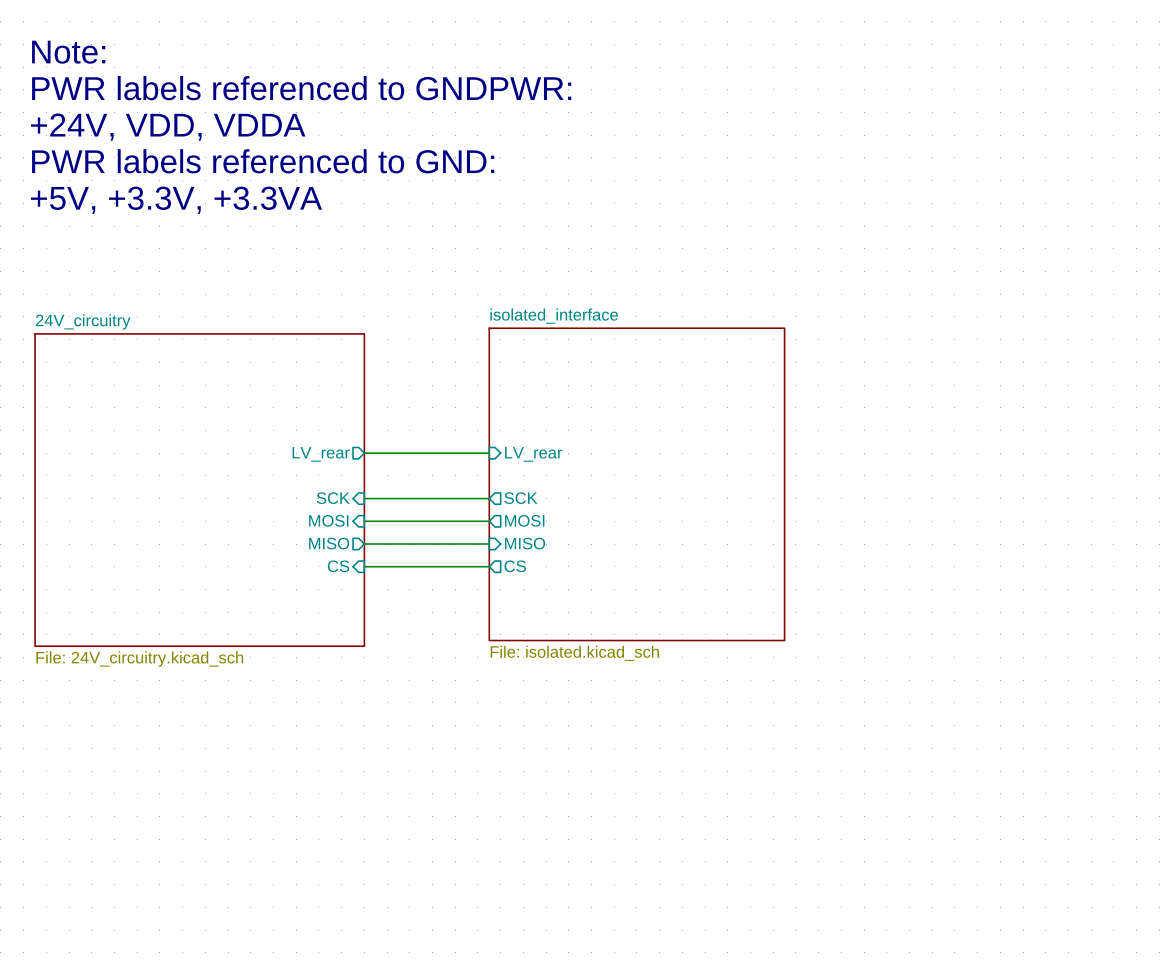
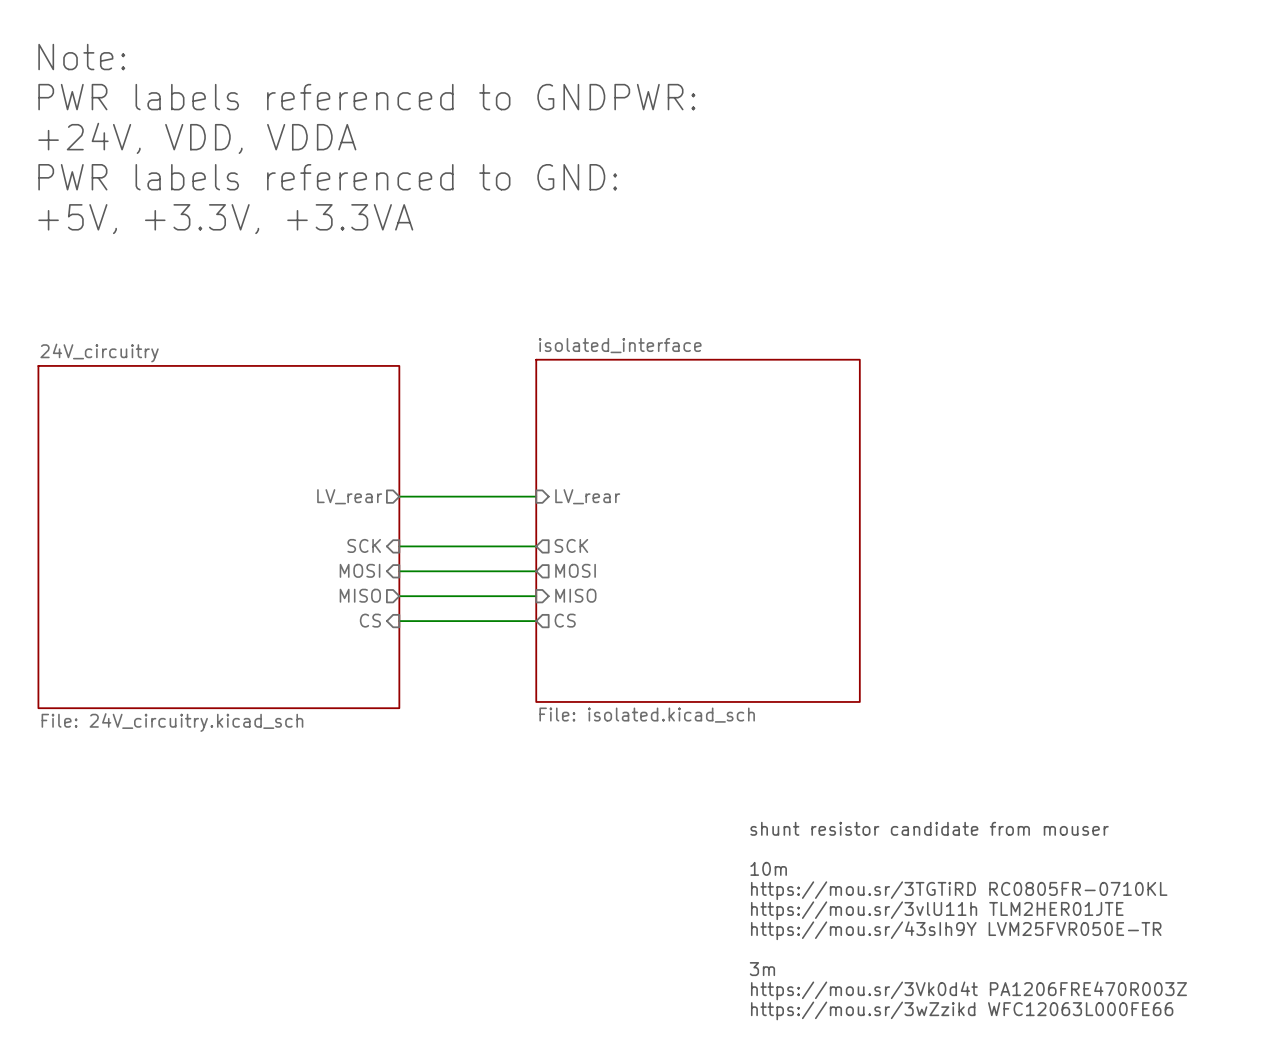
text: none -> shunt resistor candidate from mouser (929, 828)
text: none -> 10m (768, 868)
text: none -> https://mou.sr/3TGTiRD RC0805FR-0710KL (959, 890)
text: none -> https://mou.sr/3vlU11h TLM2HER01JTE (937, 910)
text: none -> https://mou.sr/43sIh9Y LVM25FVR050E-TR (956, 930)
text: none -> 3m (762, 969)
text: none -> https://mou.sr/3Vk0d4t PA1206FRE470R003Z (968, 990)
text: none -> https://mou.sr/3wZzikd WFC12063L000FE66 (962, 1010)

